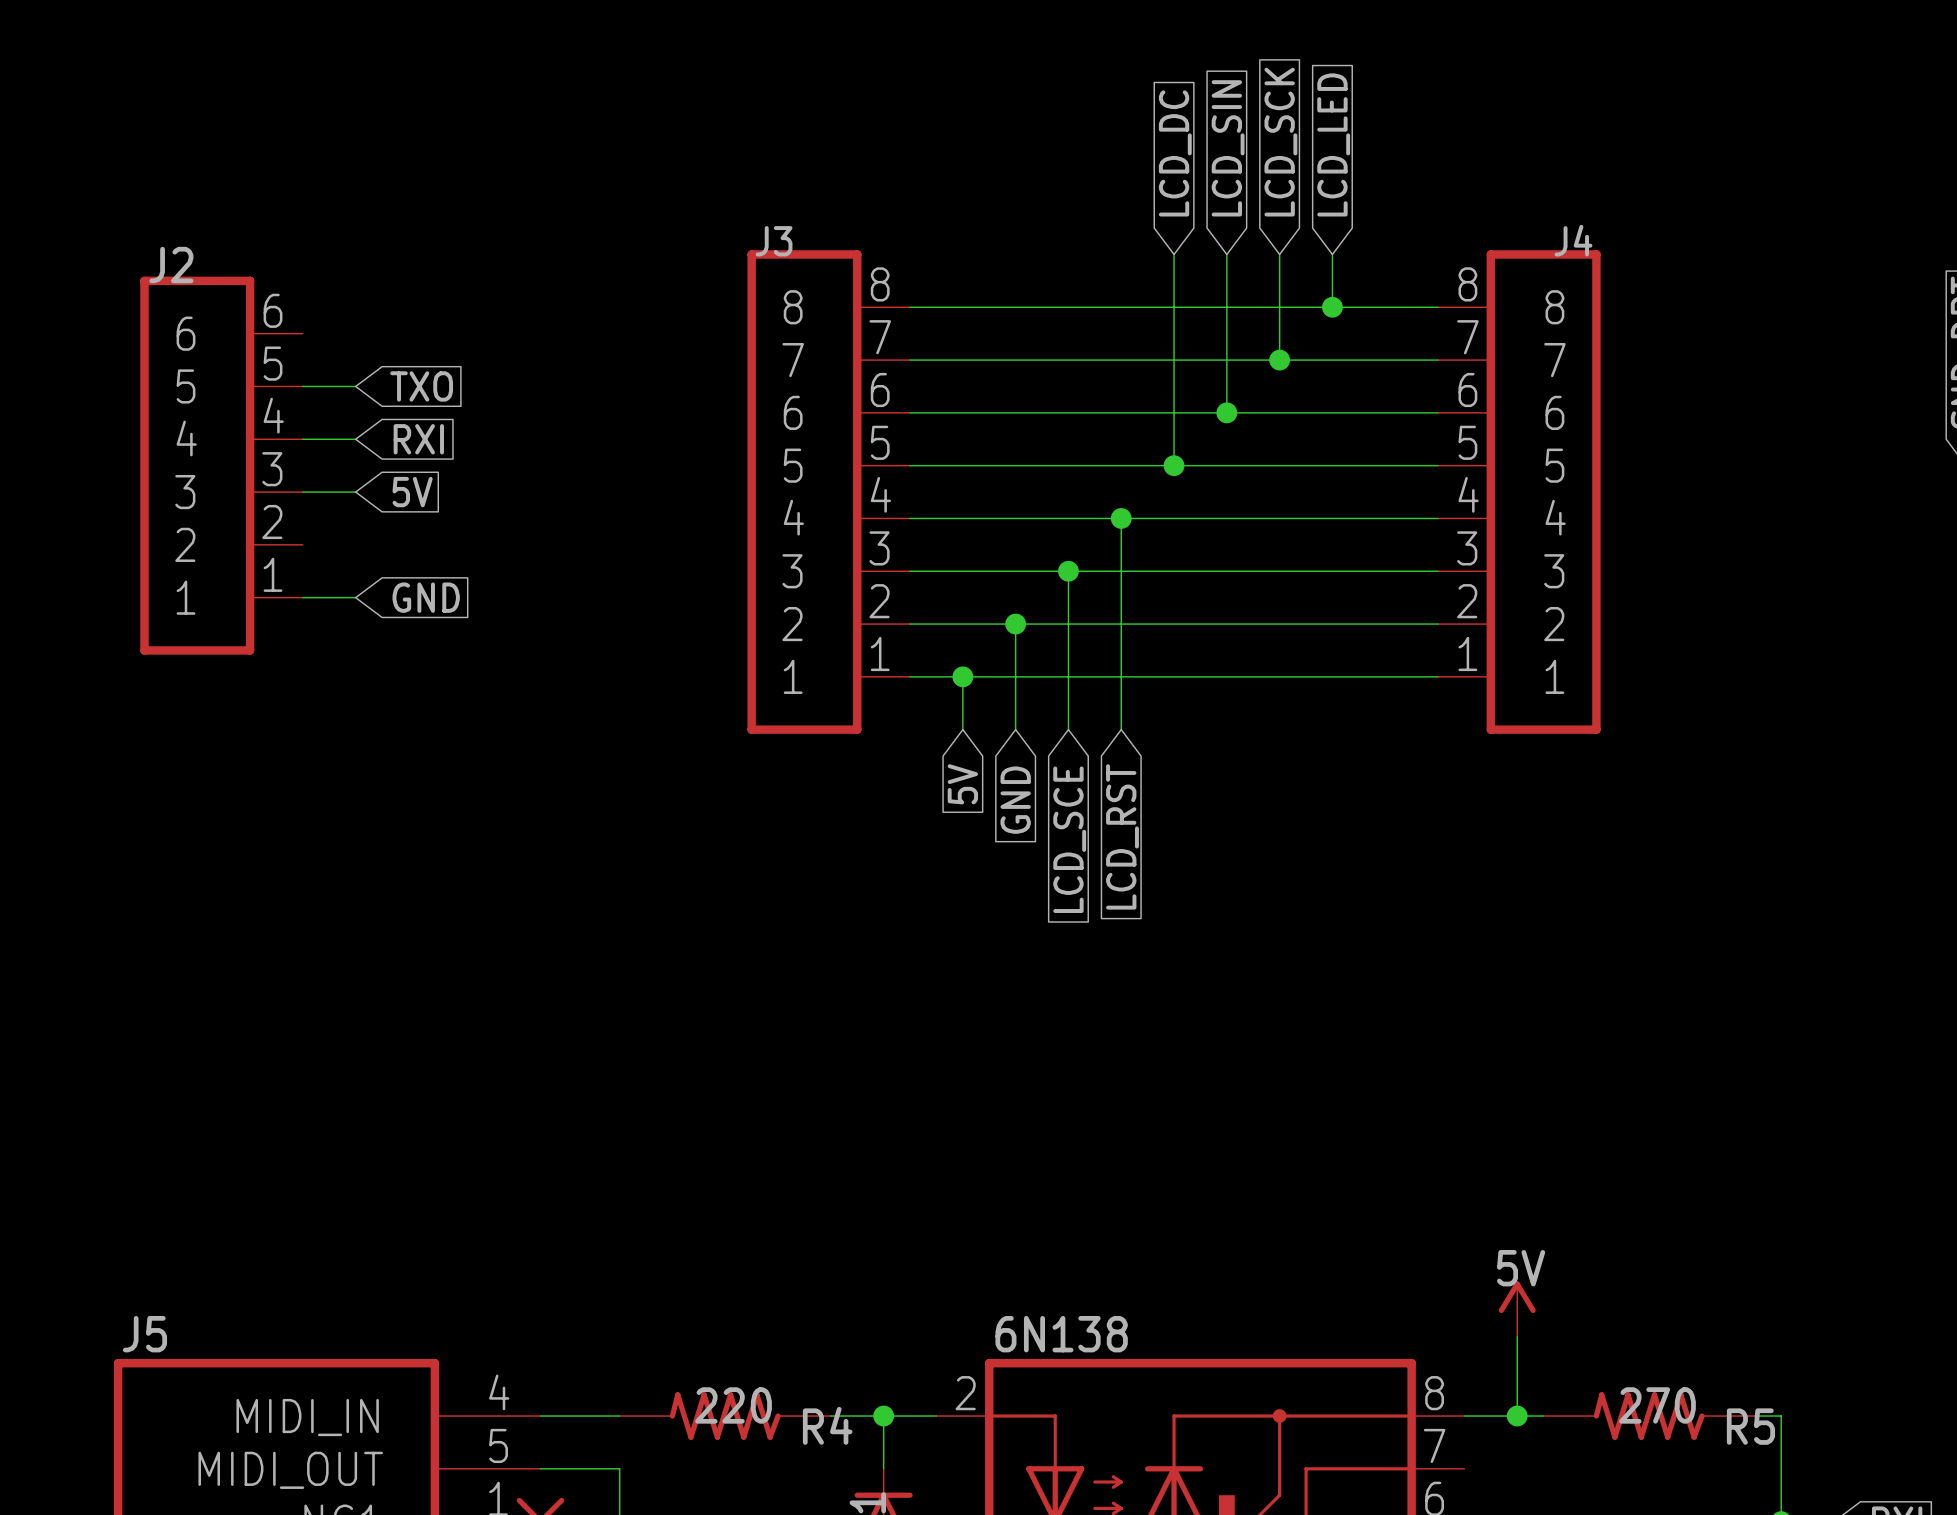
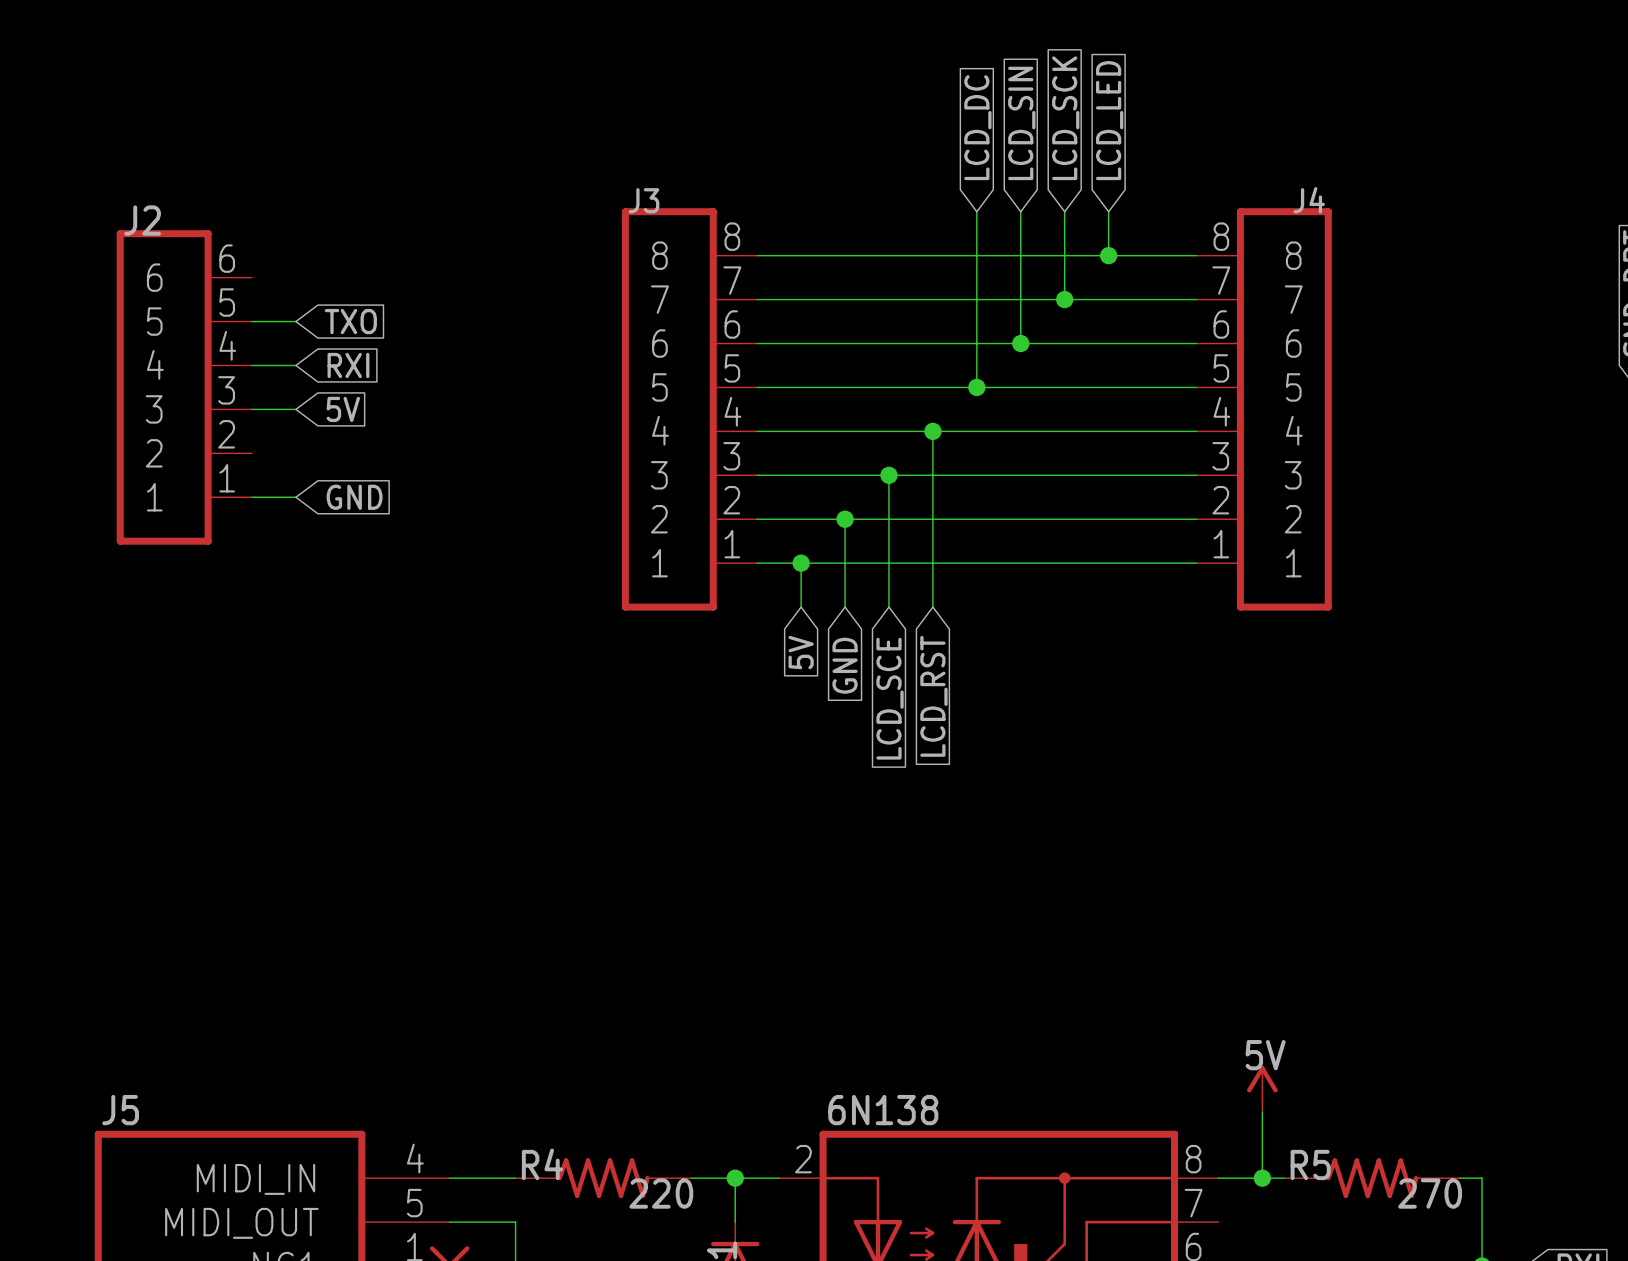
R4 value position: 220 (733, 1405) -> 220 (661, 1193)
R5 value position: 270 (1657, 1405) -> 270 (1430, 1193)
R4 rotation: 0° (725, 1416) -> 180° (603, 1178)
R5 rotation: 0° (1649, 1416) -> 180° (1372, 1178)

